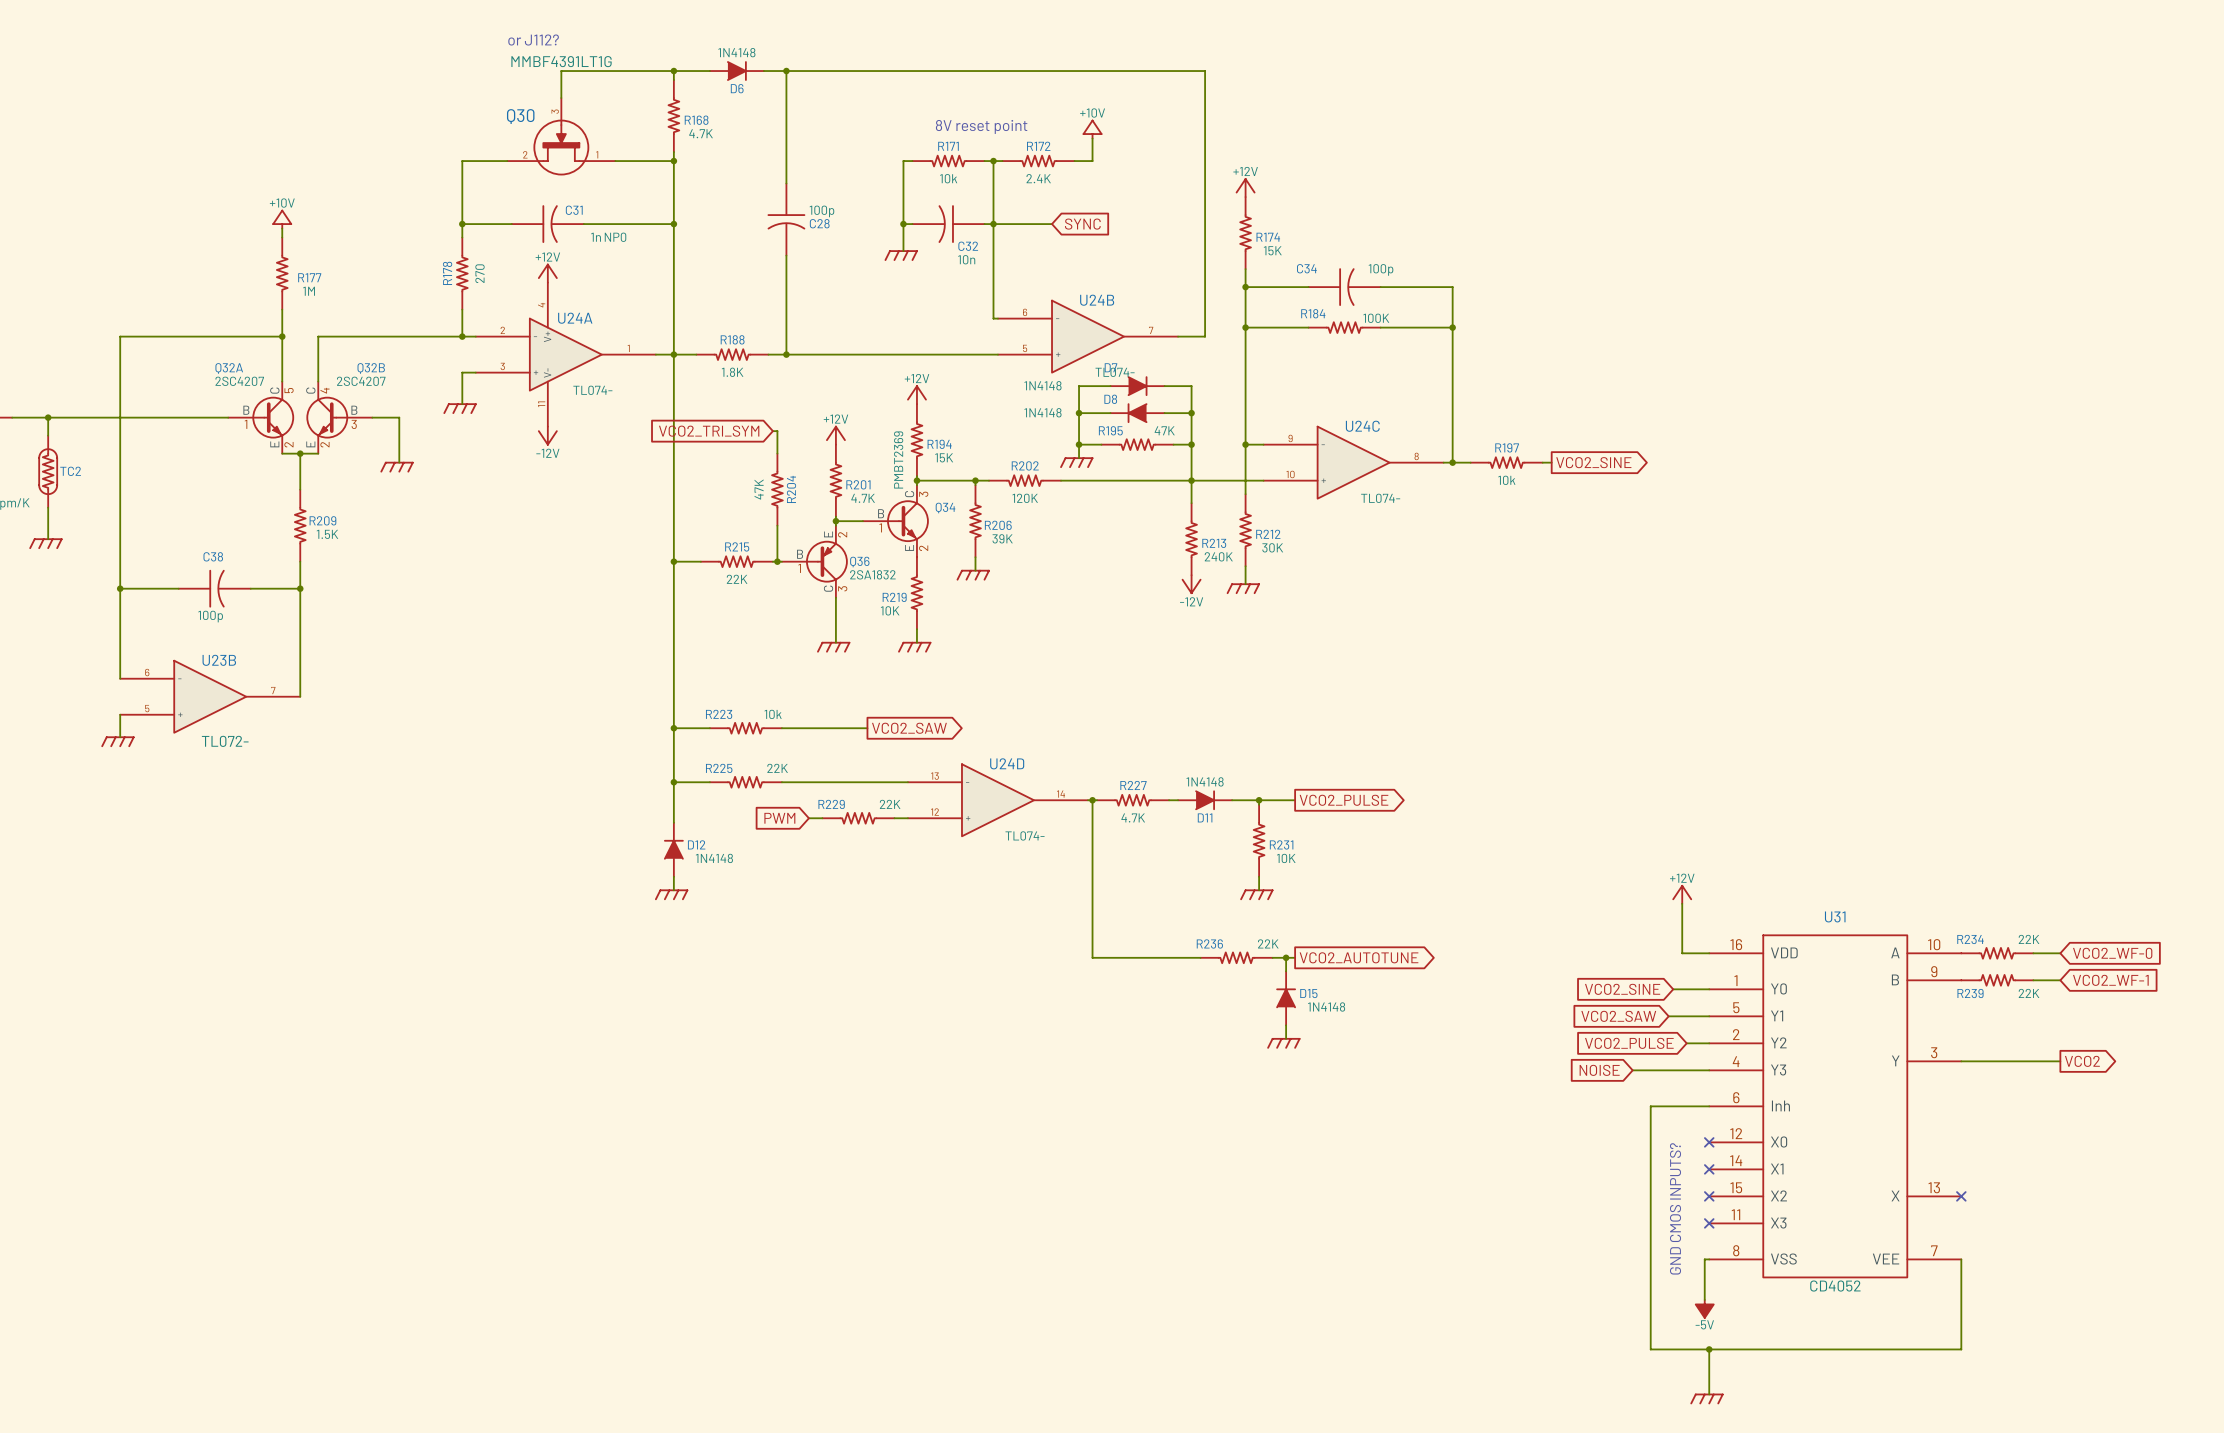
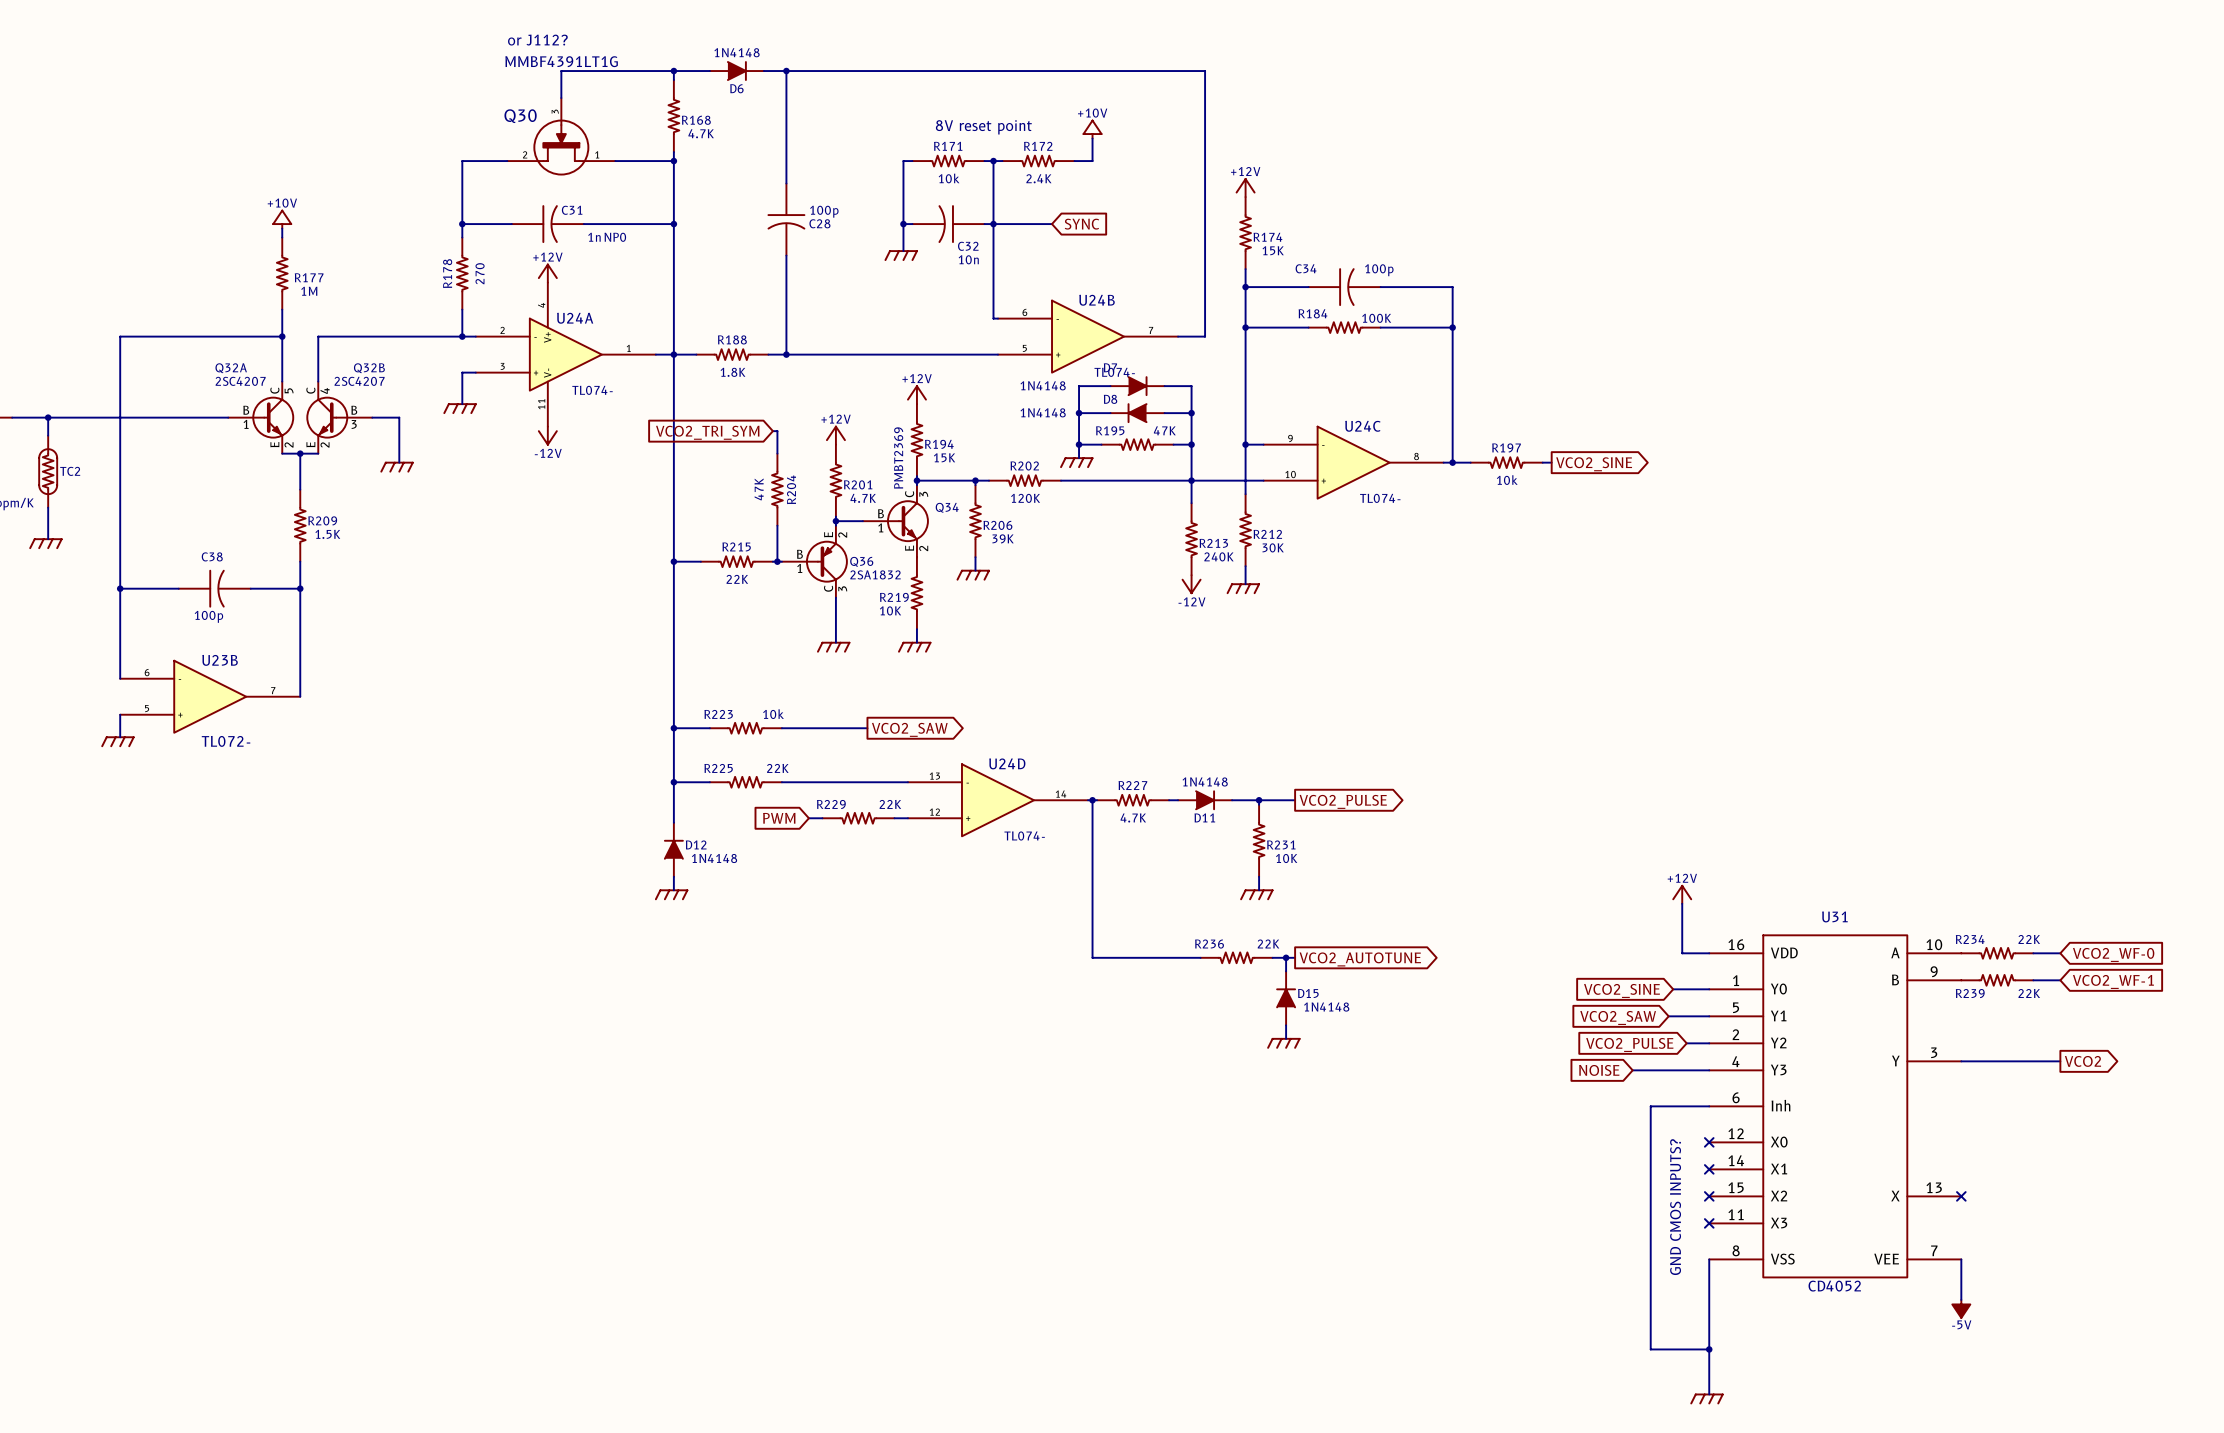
wire: (1709, 1259) (1704, 1259) (1704, 1299) -> (1709, 1259) (1709, 1349)
wire: (1961, 1299) (1961, 1349) (1709, 1349) -> none
power symbol: -5V (1704, 1308) -> none
power symbol: none -> -5V (1961, 1308)

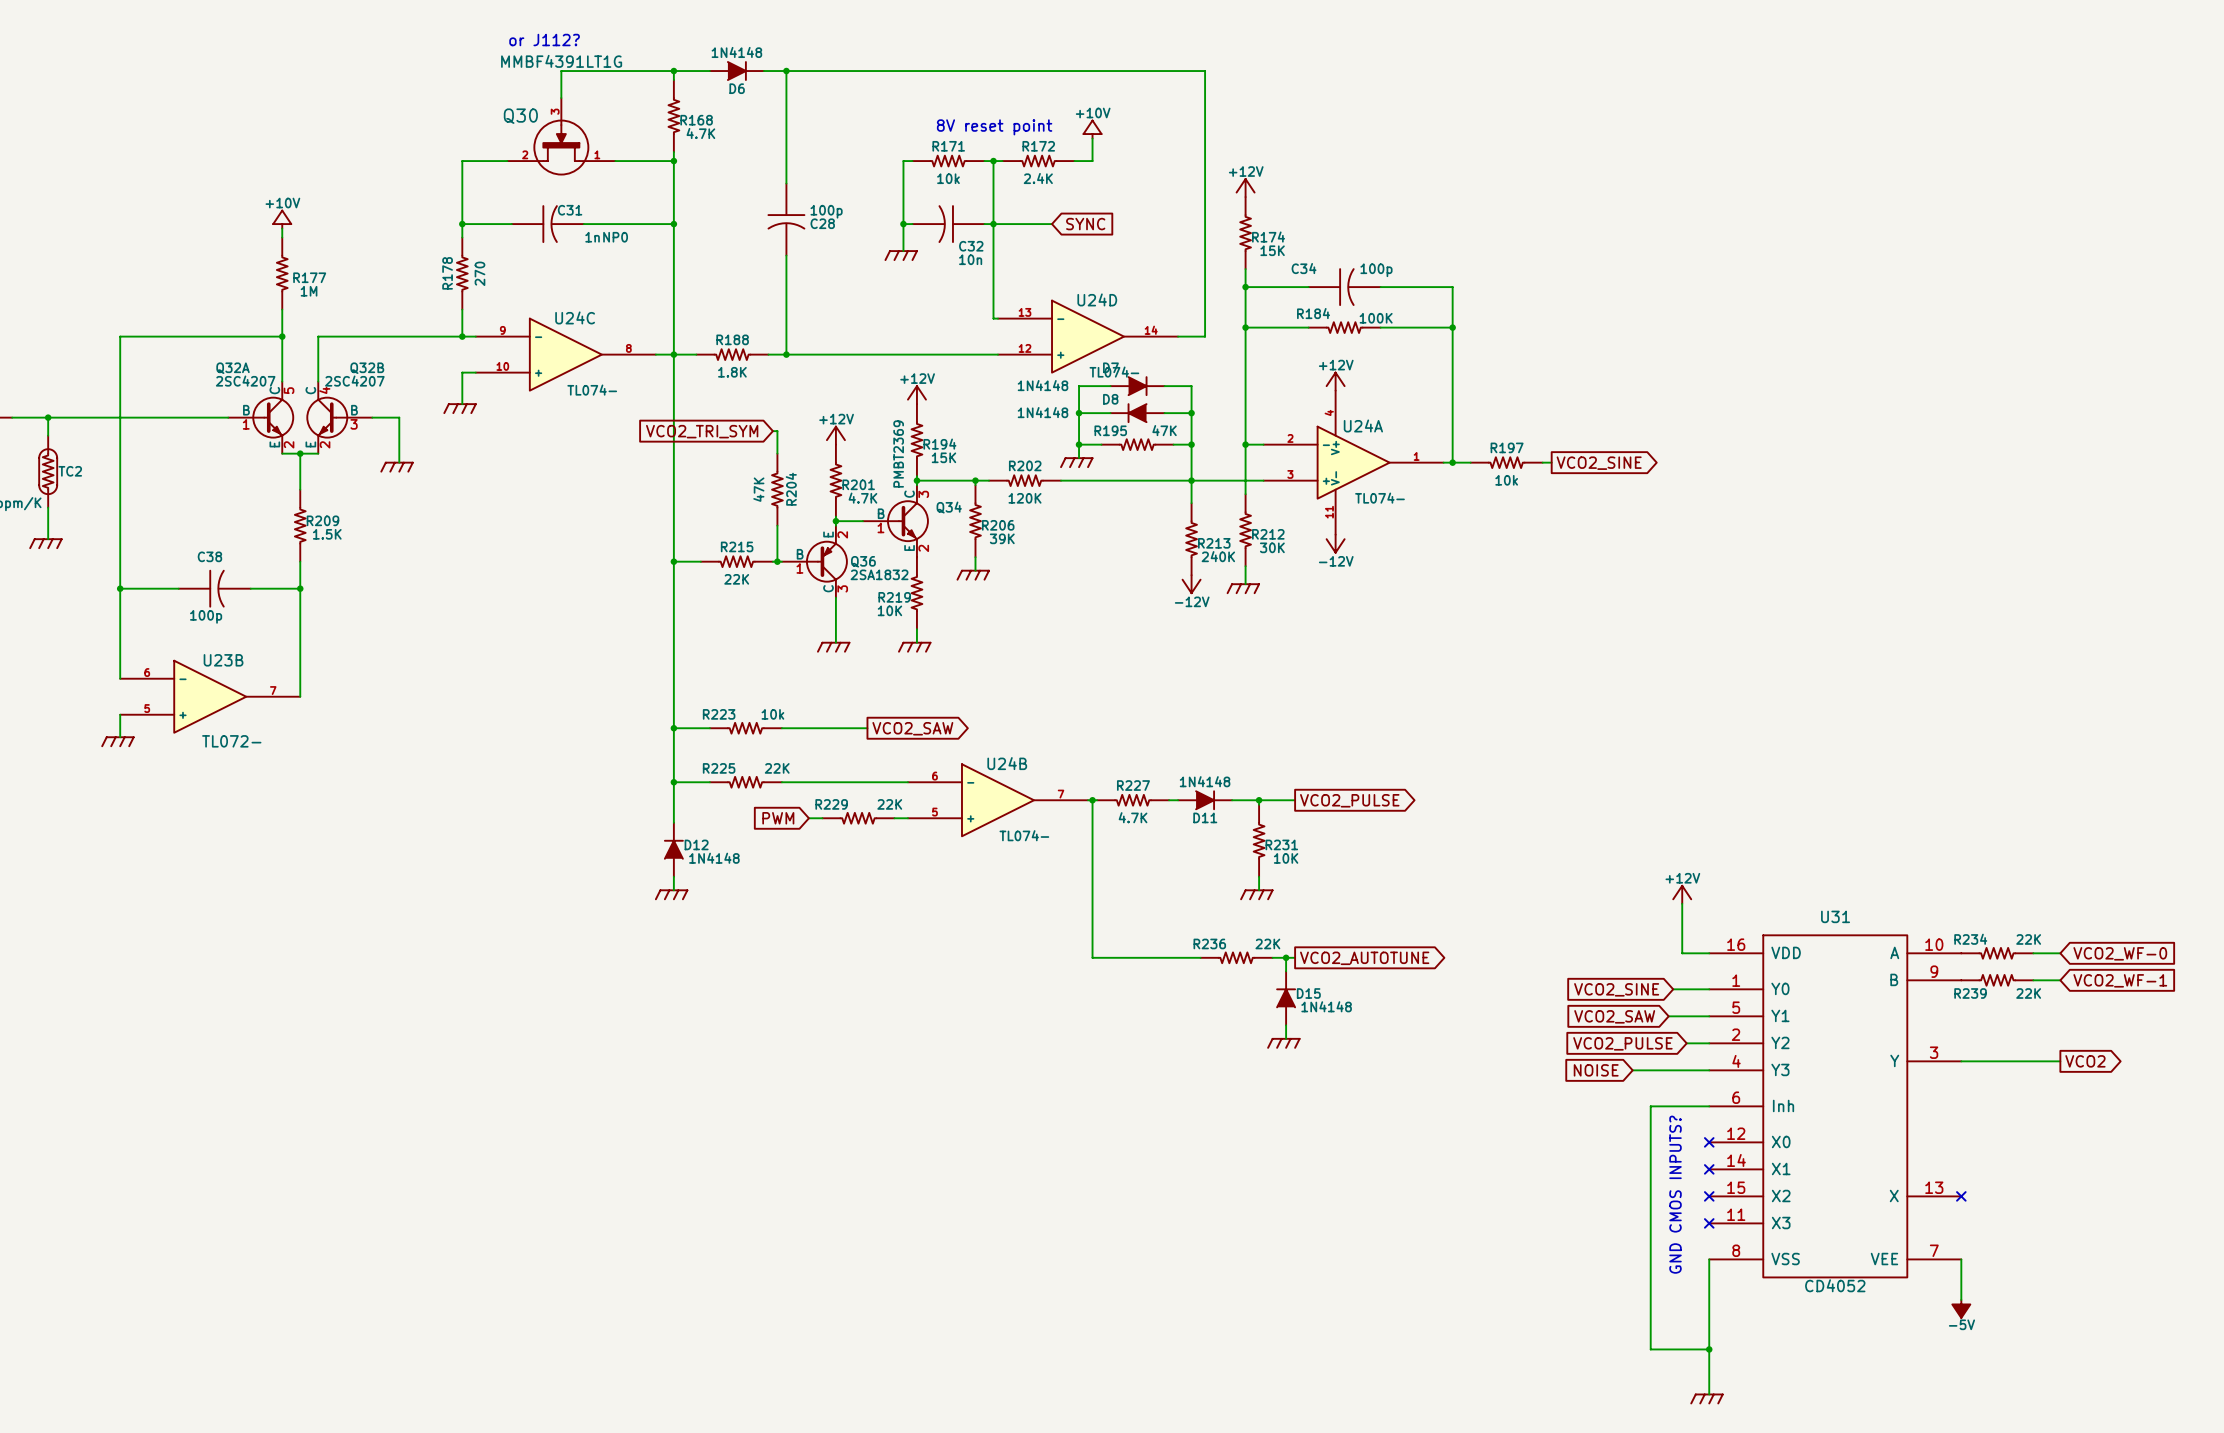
power symbol: +12V (547, 273) -> none
U24B position: (1088, 336) -> (998, 800)
U24A position: (565, 354) -> (1353, 462)
power symbol: none -> +12V (1335, 381)
power symbol: -12V (547, 435) -> none
U24C position: (1353, 462) -> (565, 354)
power symbol: none -> -12V (1335, 543)
U24D position: (998, 800) -> (1088, 336)

